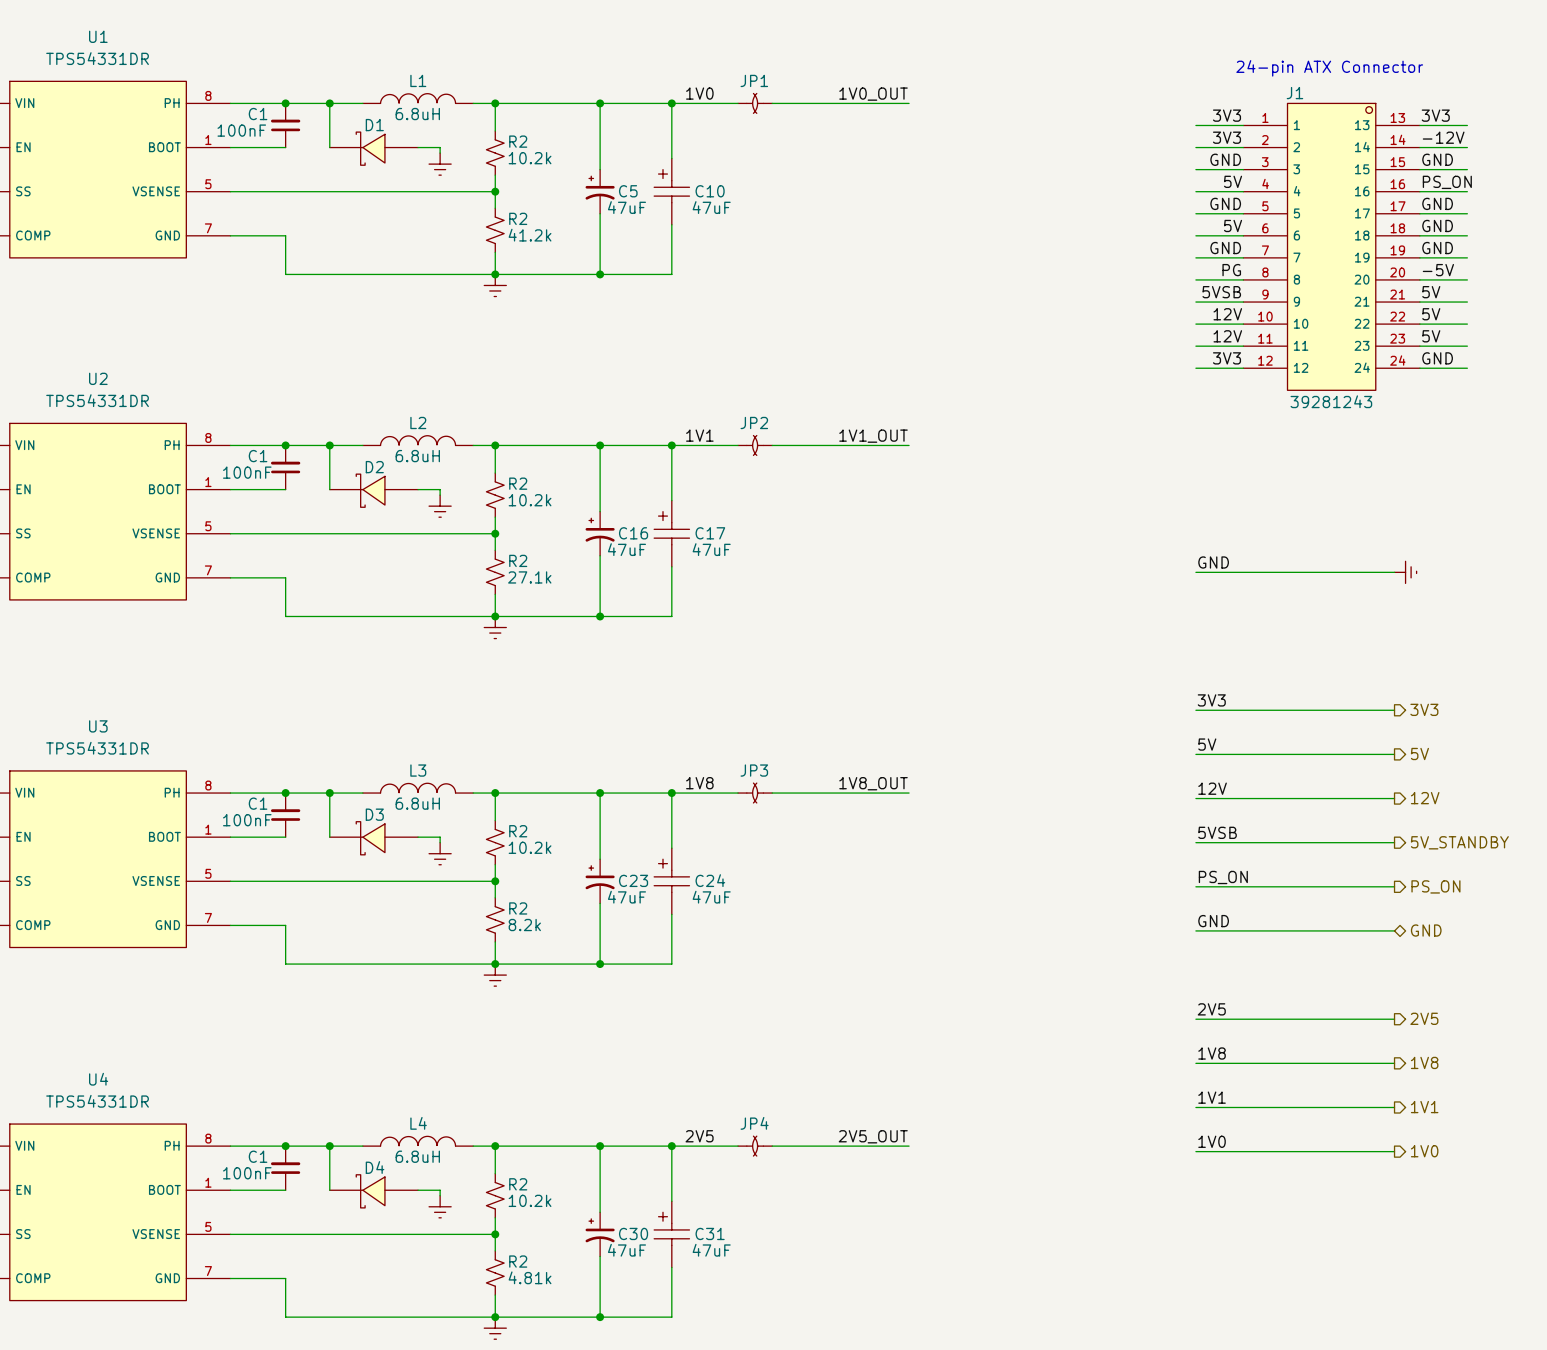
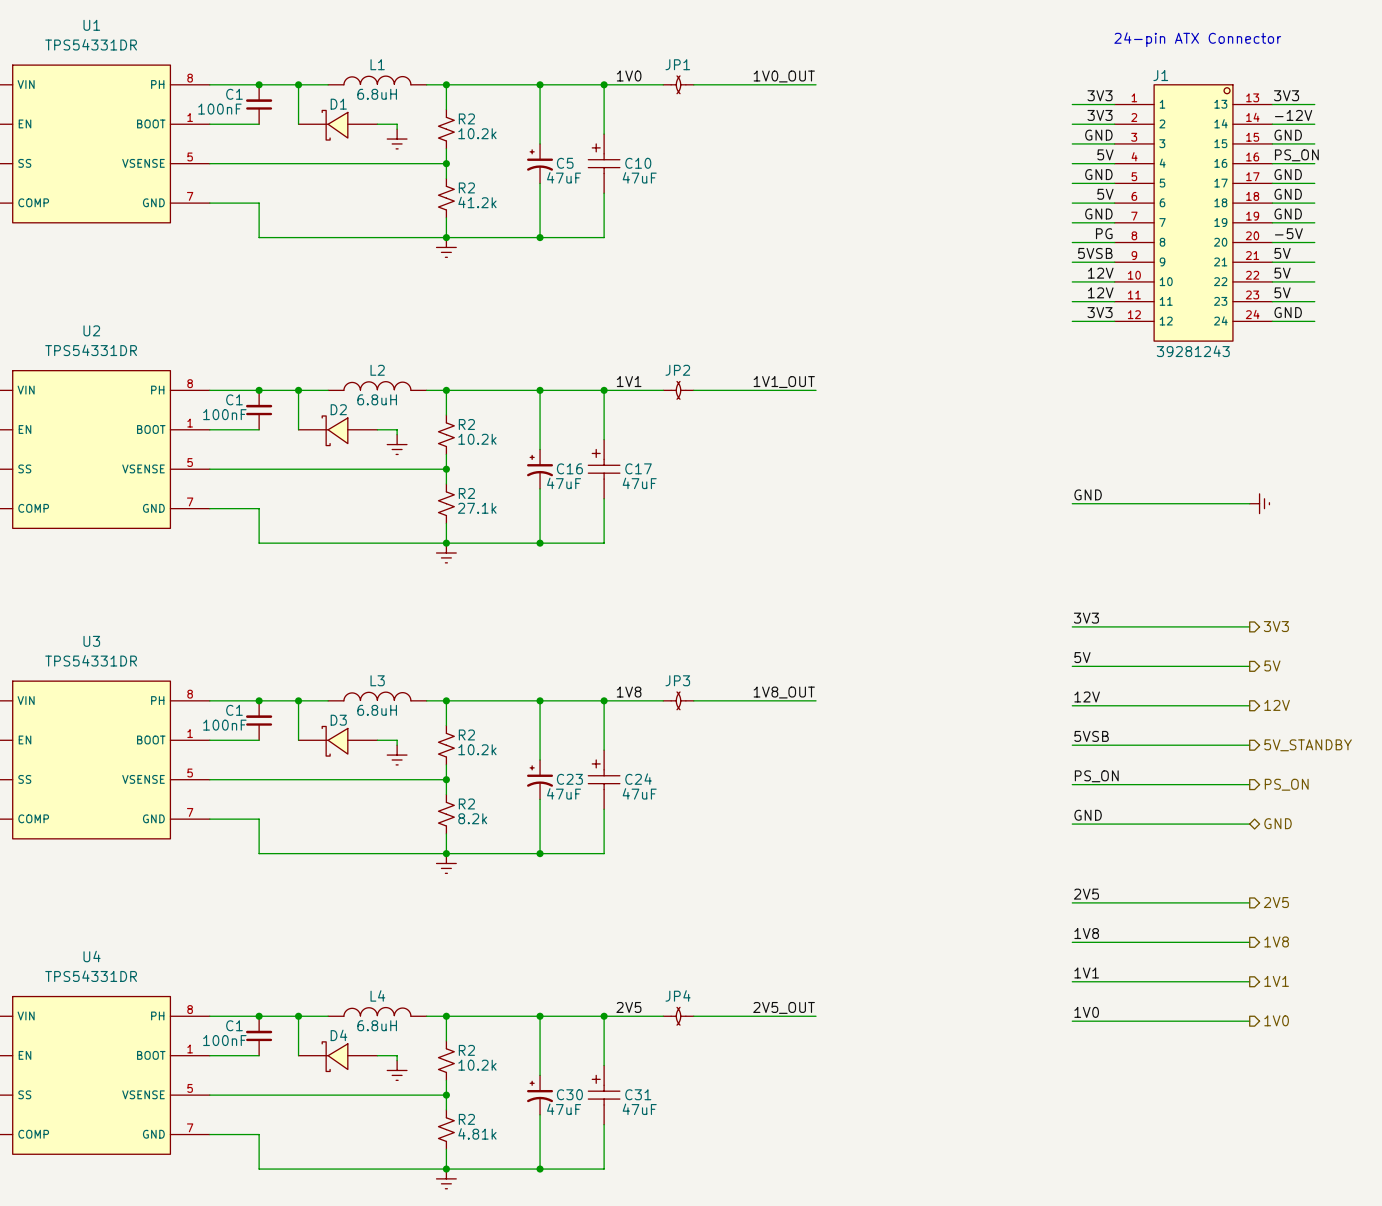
text position: 24-pin ATX Connector (1329, 68) -> 24-pin ATX Connector (1197, 39)

